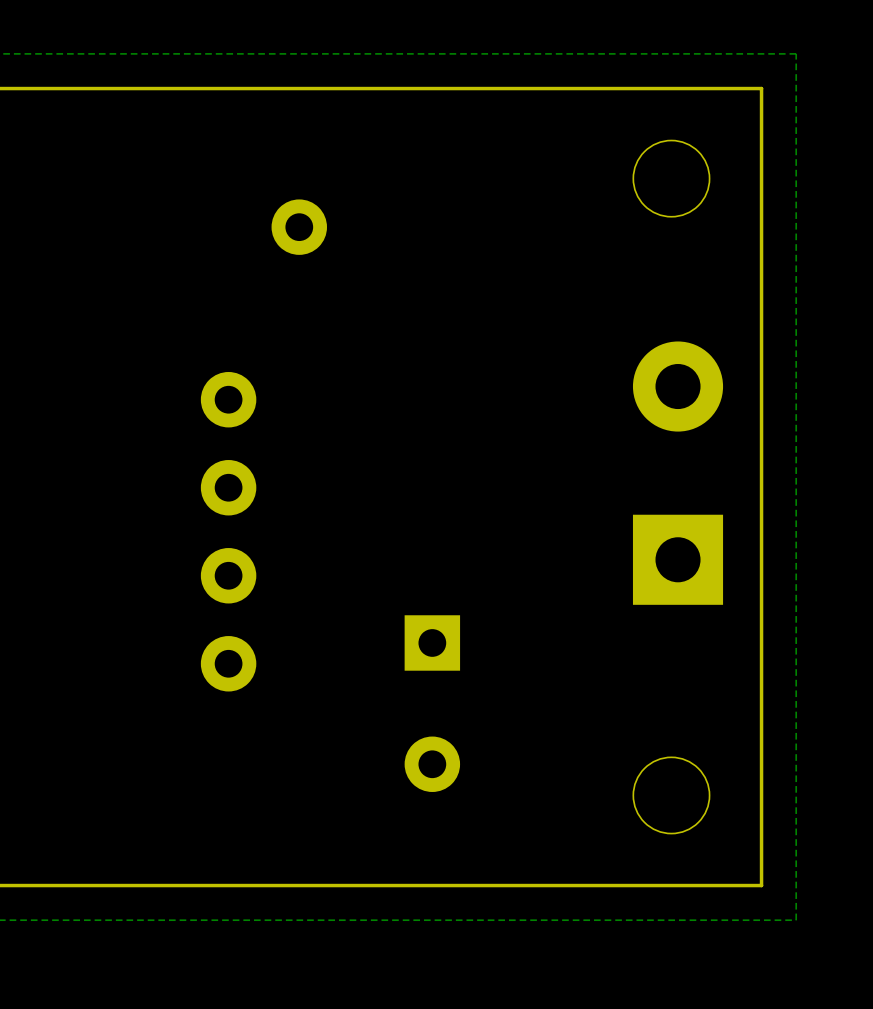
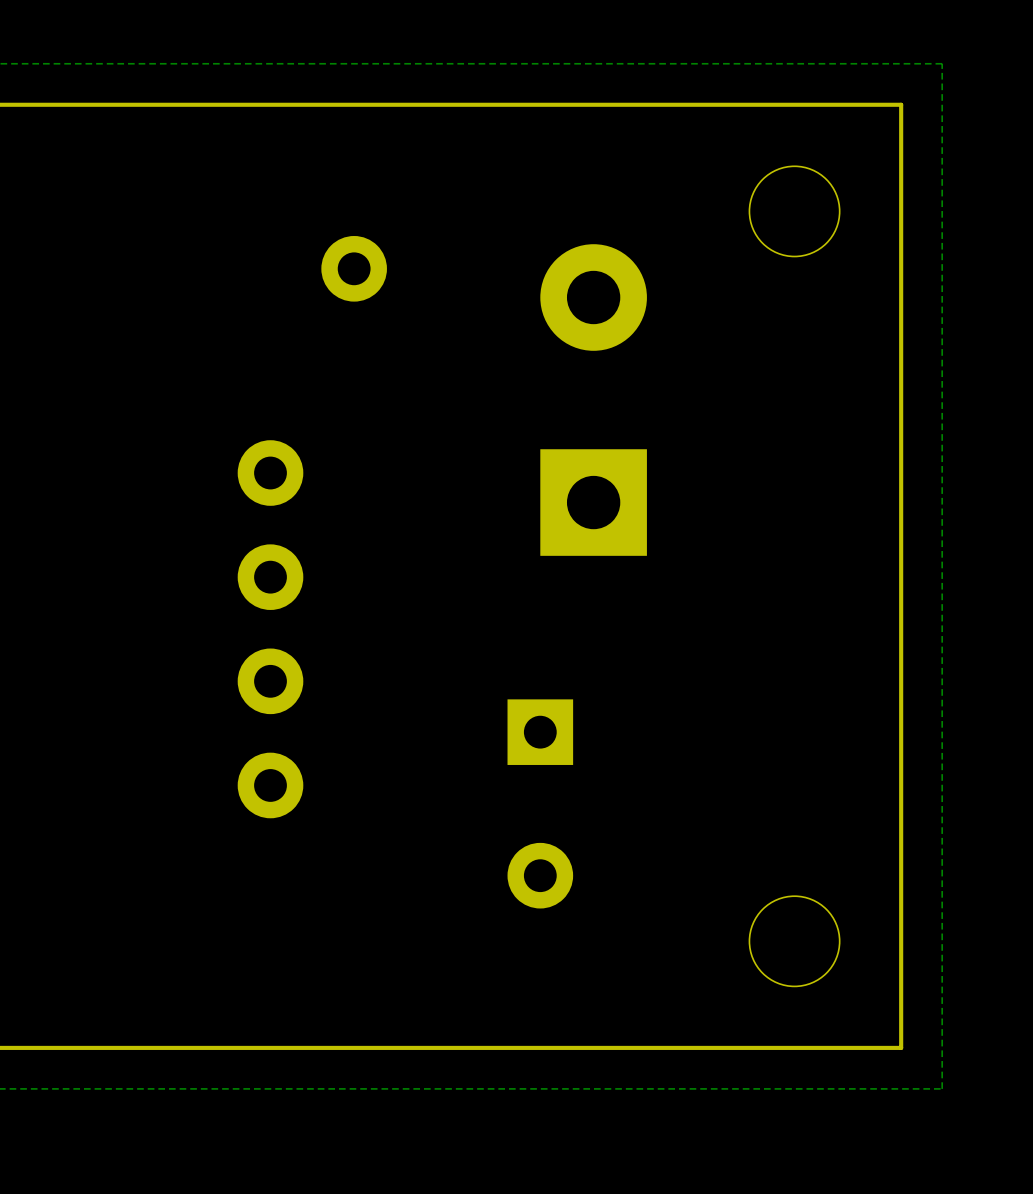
part position: (678, 473) -> (593, 400)
part position: (432, 703) -> (540, 803)

